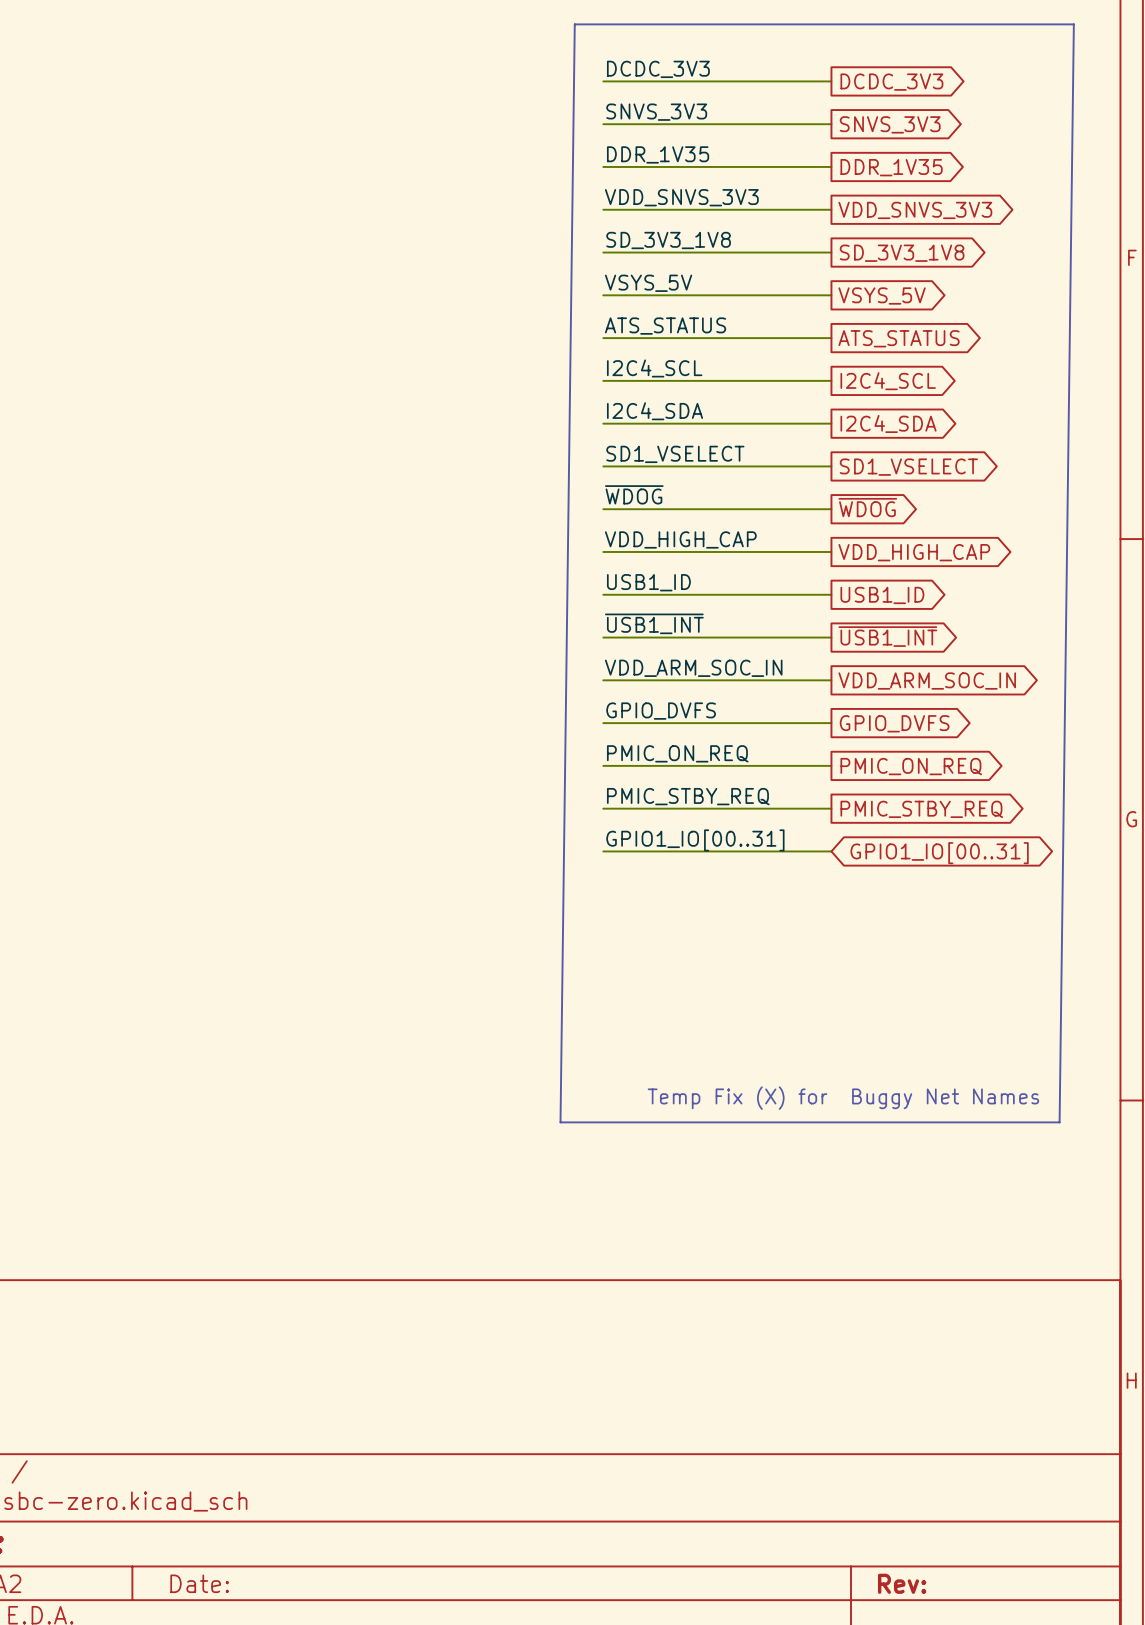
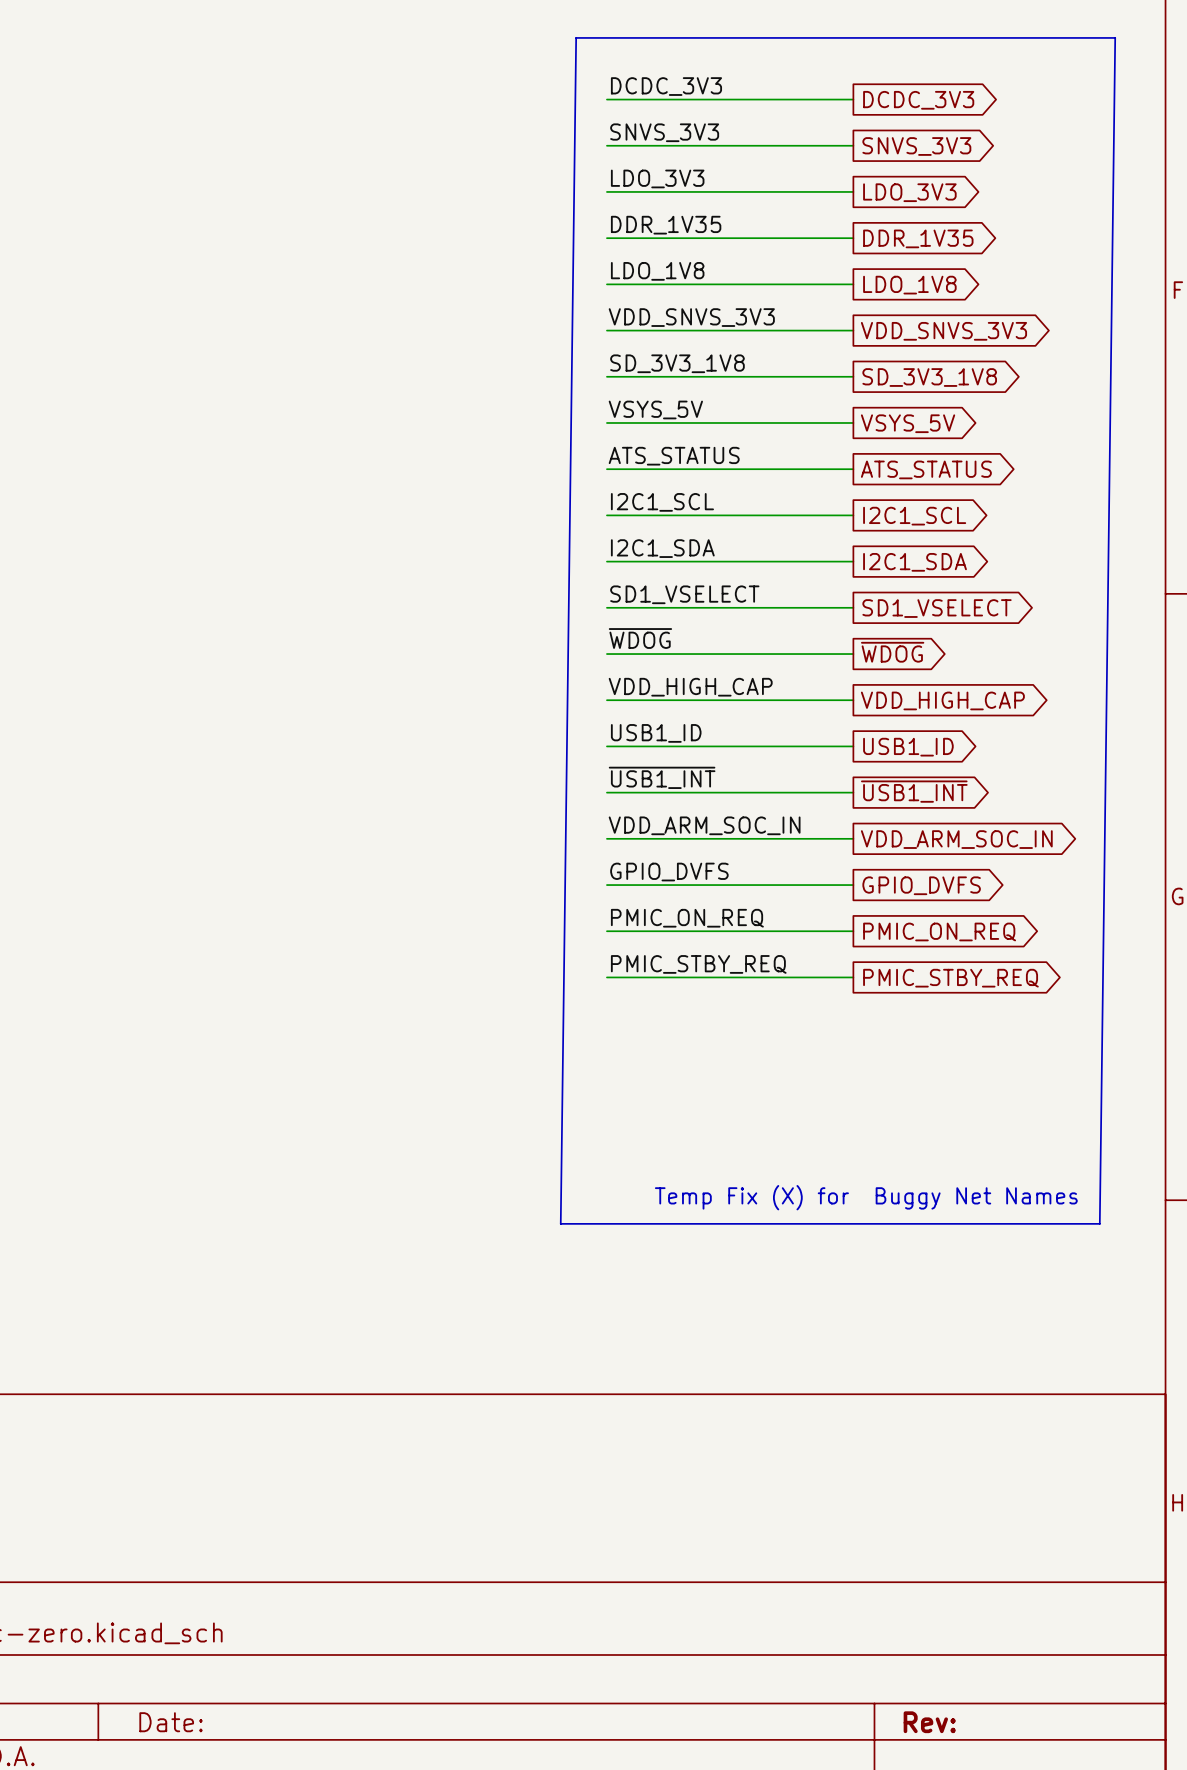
label: DDR_1V35 (658, 154) -> LDO_3V3 (657, 178)
global label: DDR_1V35 (891, 167) -> LDO_3V3 (909, 192)
label: VDD_SNVS_3V3 (681, 197) -> DDR_1V35 (666, 225)
global label: VDD_SNVS_3V3 (915, 210) -> DDR_1V35 (918, 238)
label: SD_3V3_1V8 (668, 240) -> LDO_1V8 (657, 271)
global label: SD_3V3_1V8 (902, 253) -> LDO_1V8 (909, 285)
label: VSYS_5V (648, 283) -> VDD_SNVS_3V3 (691, 317)
global label: VSYS_5V (882, 296) -> VDD_SNVS_3V3 (943, 331)
label: ATS_STATUS (665, 326) -> SD_3V3_1V8 (677, 363)
global label: ATS_STATUS (899, 338) -> SD_3V3_1V8 (929, 377)
label: I2C4_SCL (654, 368) -> VSYS_5V (655, 409)
global label: I2C4_SCL (888, 381) -> VSYS_5V (908, 423)
label: I2C4_SDA (655, 411) -> ATS_STATUS (674, 456)
global label: I2C4_SDA (888, 423) -> ATS_STATUS (926, 469)
label: SD1_VSELECT (675, 454) -> I2C1_SCL (662, 502)
global label: SD1_VSELECT (908, 467) -> I2C1_SCL (914, 516)
label: ~{WDOG} (634, 494) -> I2C1_SDA (662, 548)
global label: ~{WDOG} (867, 507) -> I2C1_SDA (915, 562)
label: VDD_HIGH_CAP (680, 539) -> SD1_VSELECT (684, 594)
global label: VDD_HIGH_CAP (914, 552) -> SD1_VSELECT (937, 608)
label: USB1_ID (648, 582) -> ~{WDOG} (640, 638)
global label: USB1_ID (882, 595) -> ~{WDOG} (892, 652)
label: ~{USB1_INT} (654, 623) -> VDD_HIGH_CAP (690, 687)
global label: ~{USB1_INT} (887, 636) -> VDD_HIGH_CAP (942, 700)
label: VDD_ARM_SOC_IN (693, 668) -> USB1_ID (656, 733)
global label: VDD_ARM_SOC_IN (927, 681) -> USB1_ID (908, 747)
label: GPIO_DVFS (661, 711) -> ~{USB1_INT} (662, 777)
global label: GPIO_DVFS (894, 723) -> ~{USB1_INT} (914, 791)
label: PMIC_ON_REQ (677, 753) -> VDD_ARM_SOC_IN (704, 825)
global label: PMIC_ON_REQ (911, 766) -> VDD_ARM_SOC_IN (956, 839)
label: PMIC_STBY_REQ (688, 796) -> GPIO_DVFS (669, 872)
global label: PMIC_STBY_REQ (921, 809) -> GPIO_DVFS (921, 885)
label: GPIO1_IO[00..31] (695, 840) -> PMIC_ON_REQ (687, 918)
global label shape: bidirectional (939, 853) -> output (939, 931)
global label: GPIO1_IO[00..31] (939, 853) -> PMIC_ON_REQ (939, 931)
label: none -> PMIC_STBY_REQ (698, 964)
wire: none -> (606, 977) (853, 977)
global label: none -> PMIC_STBY_REQ (950, 978)

